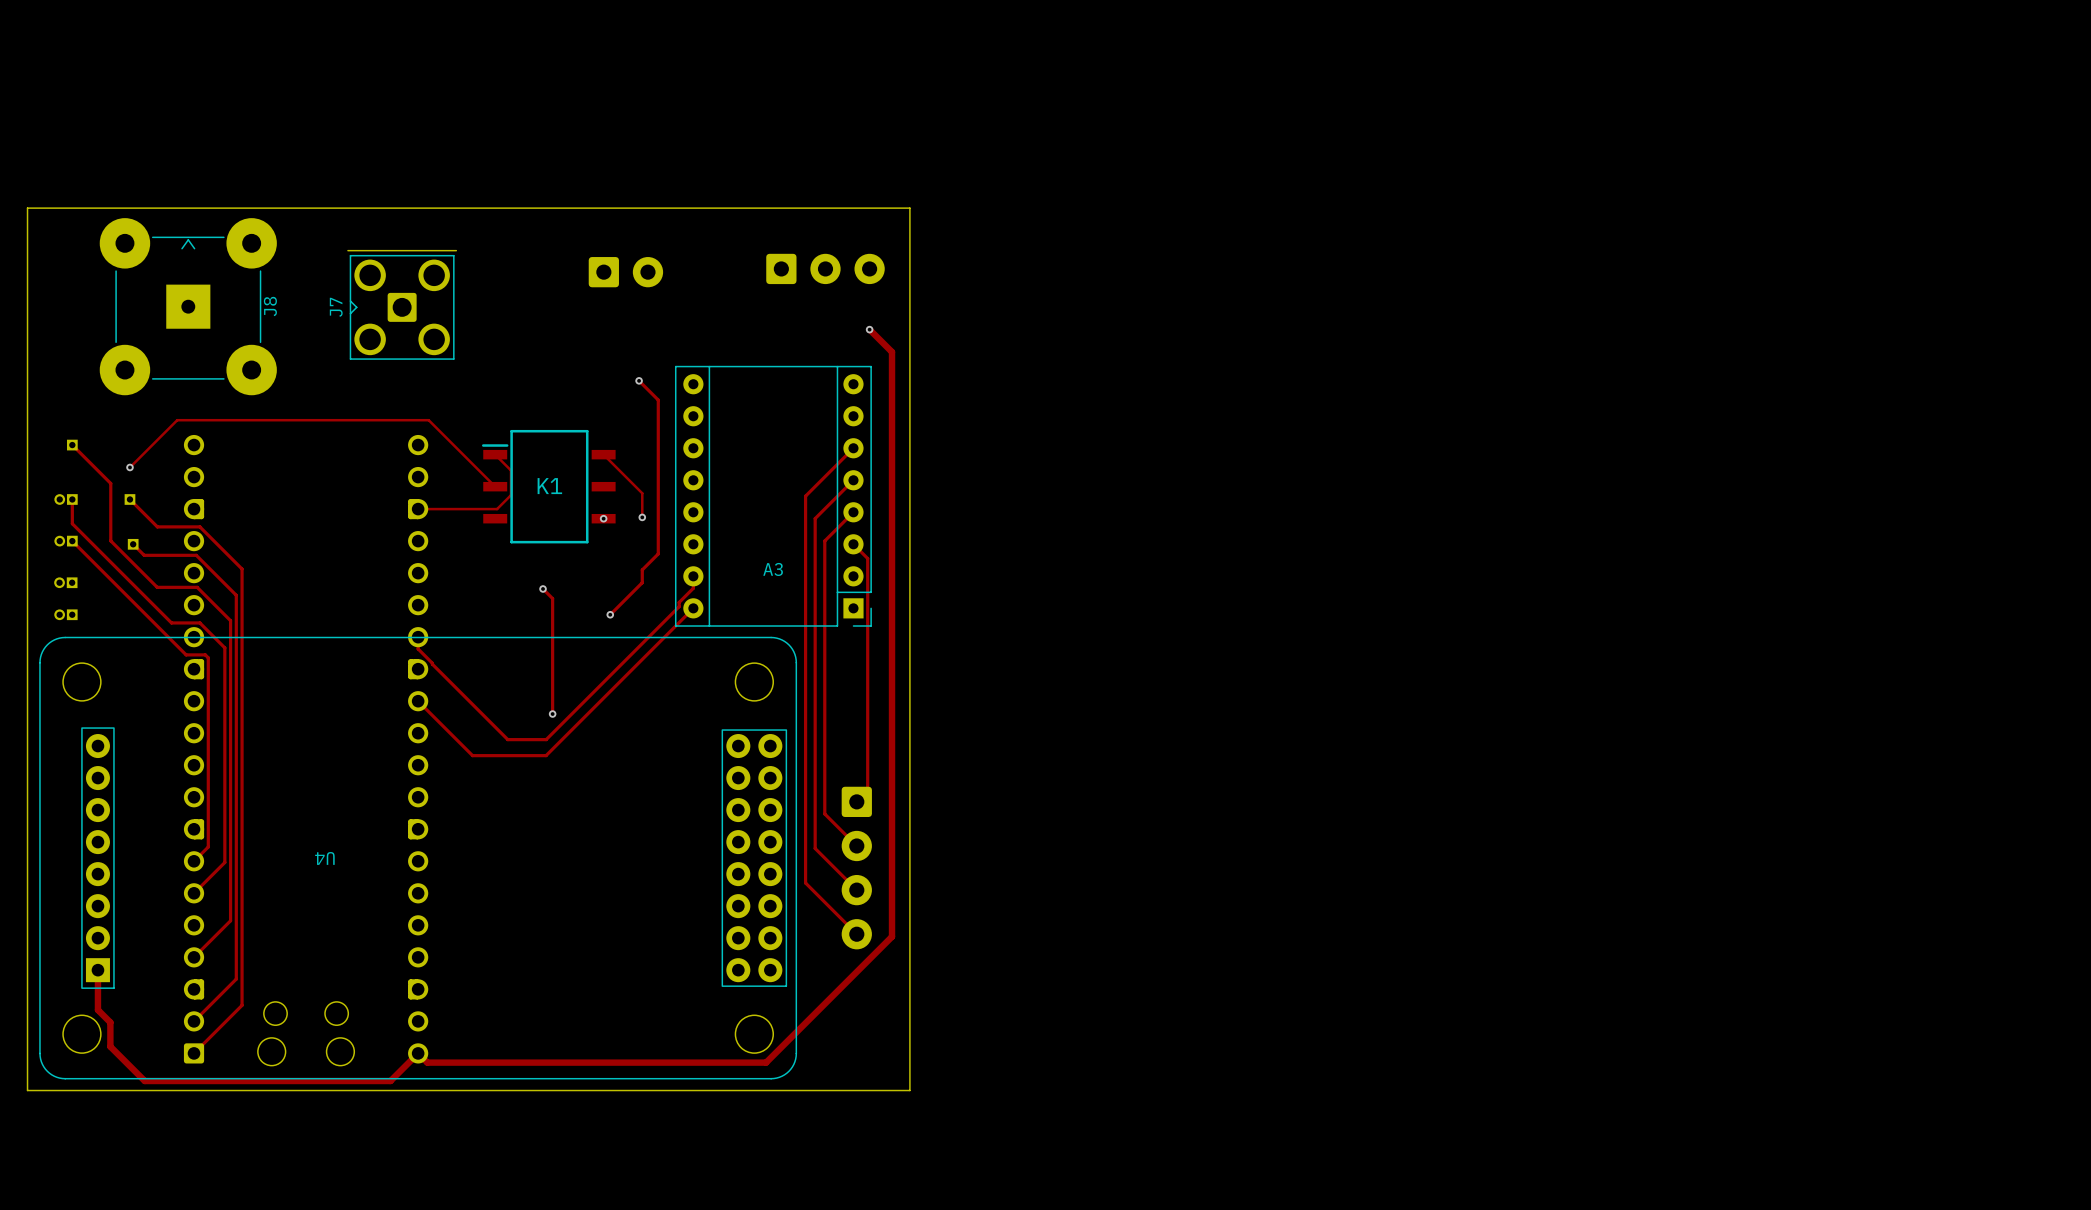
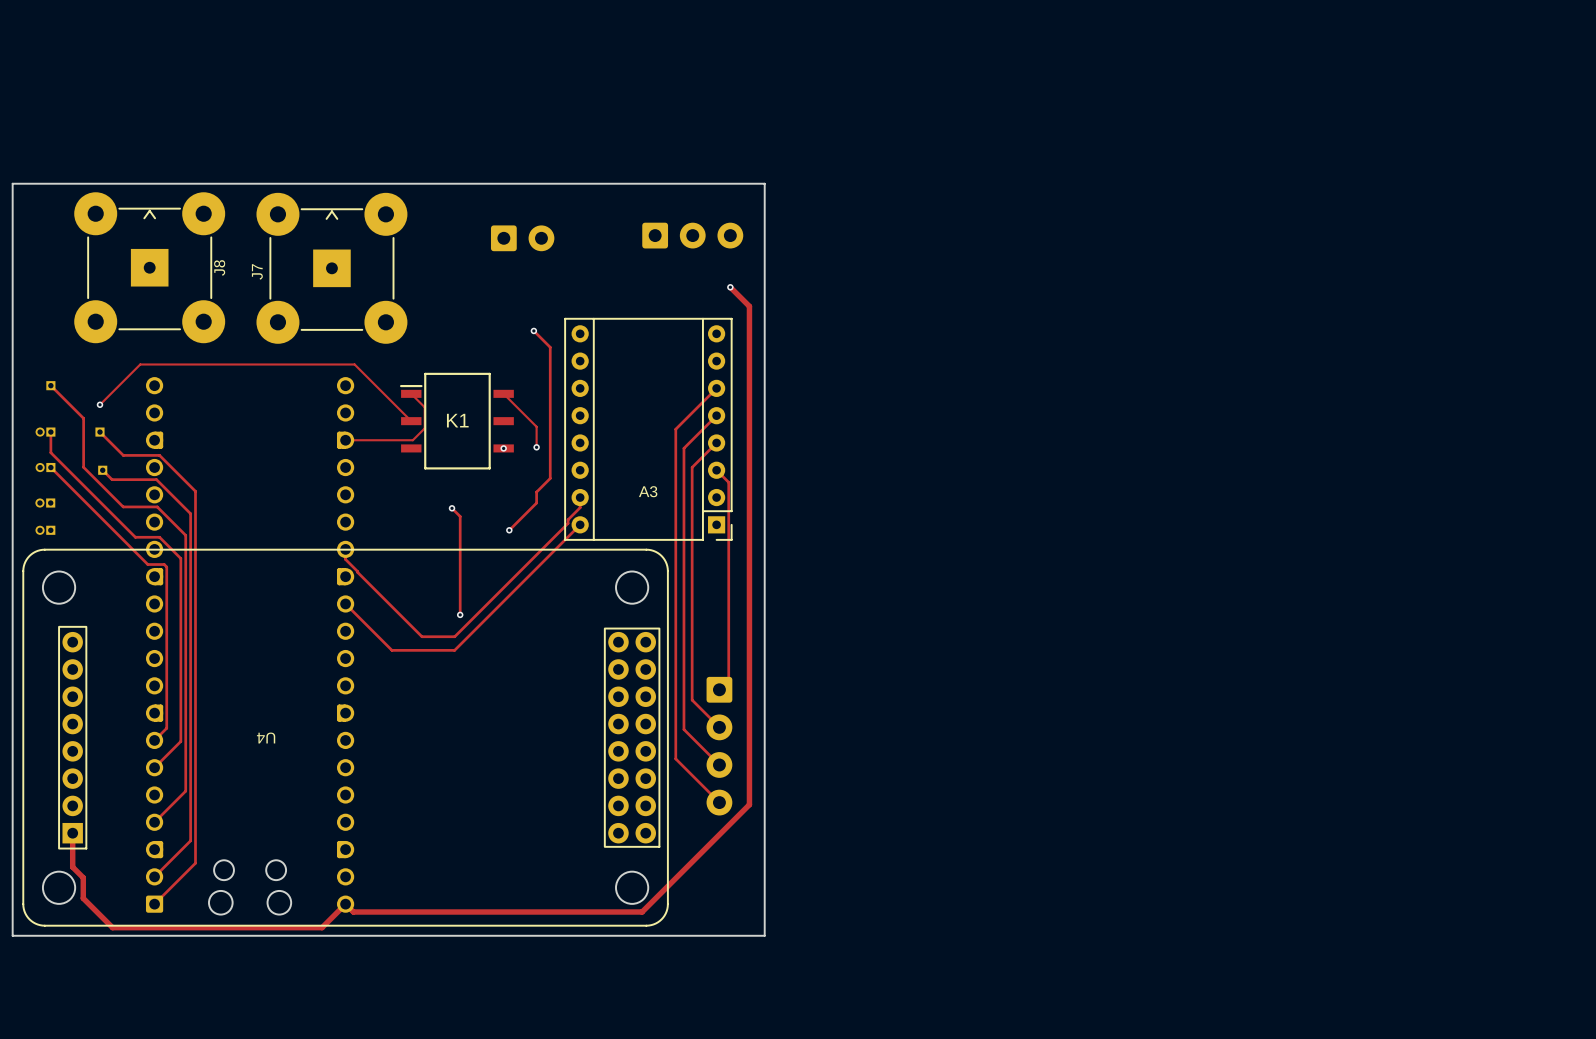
J7 footprint: [347, 250, 457, 360] -> [256, 192, 408, 344]

